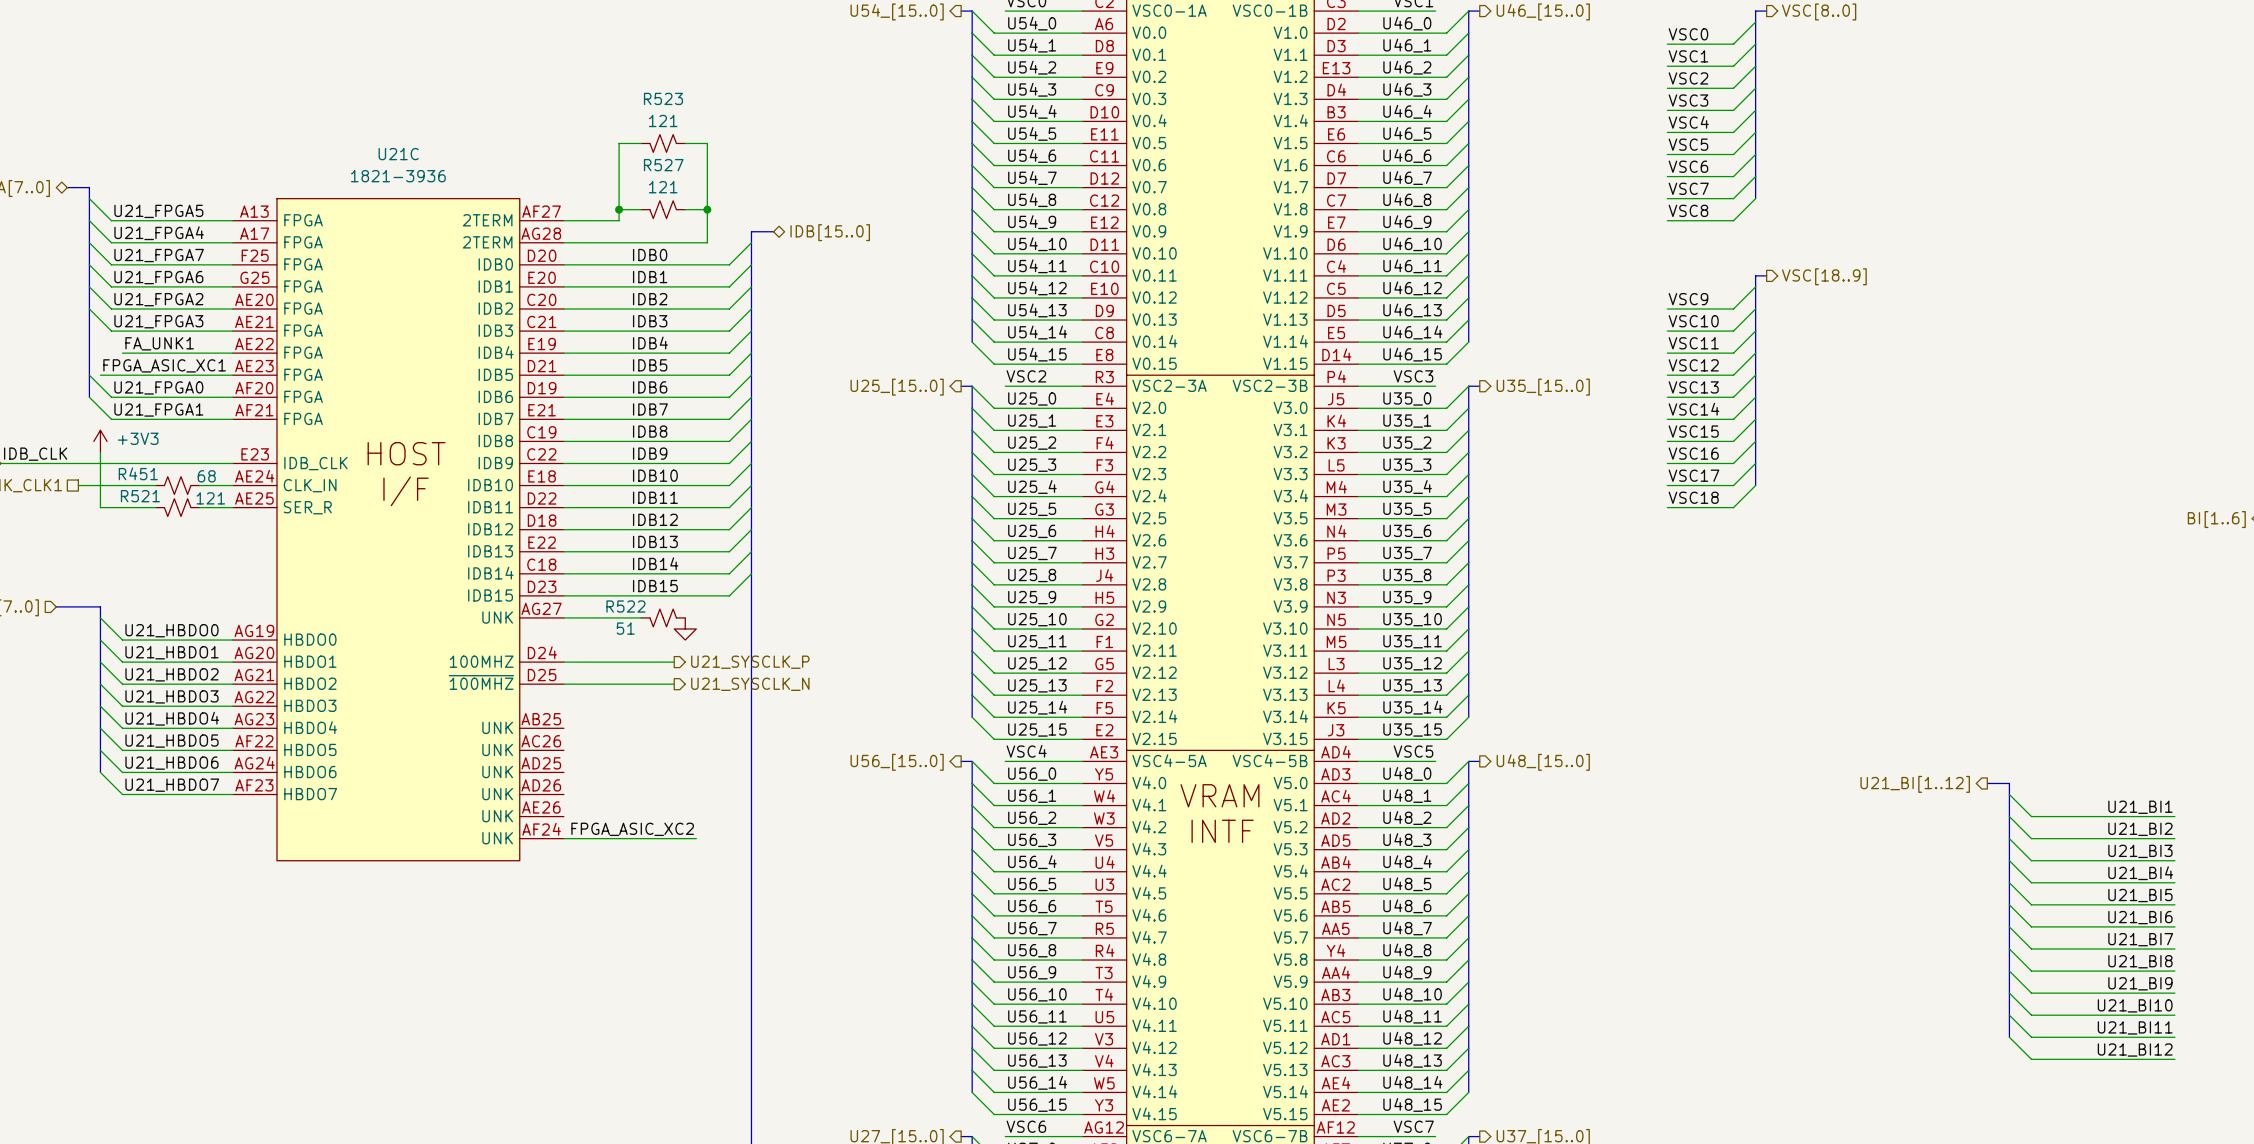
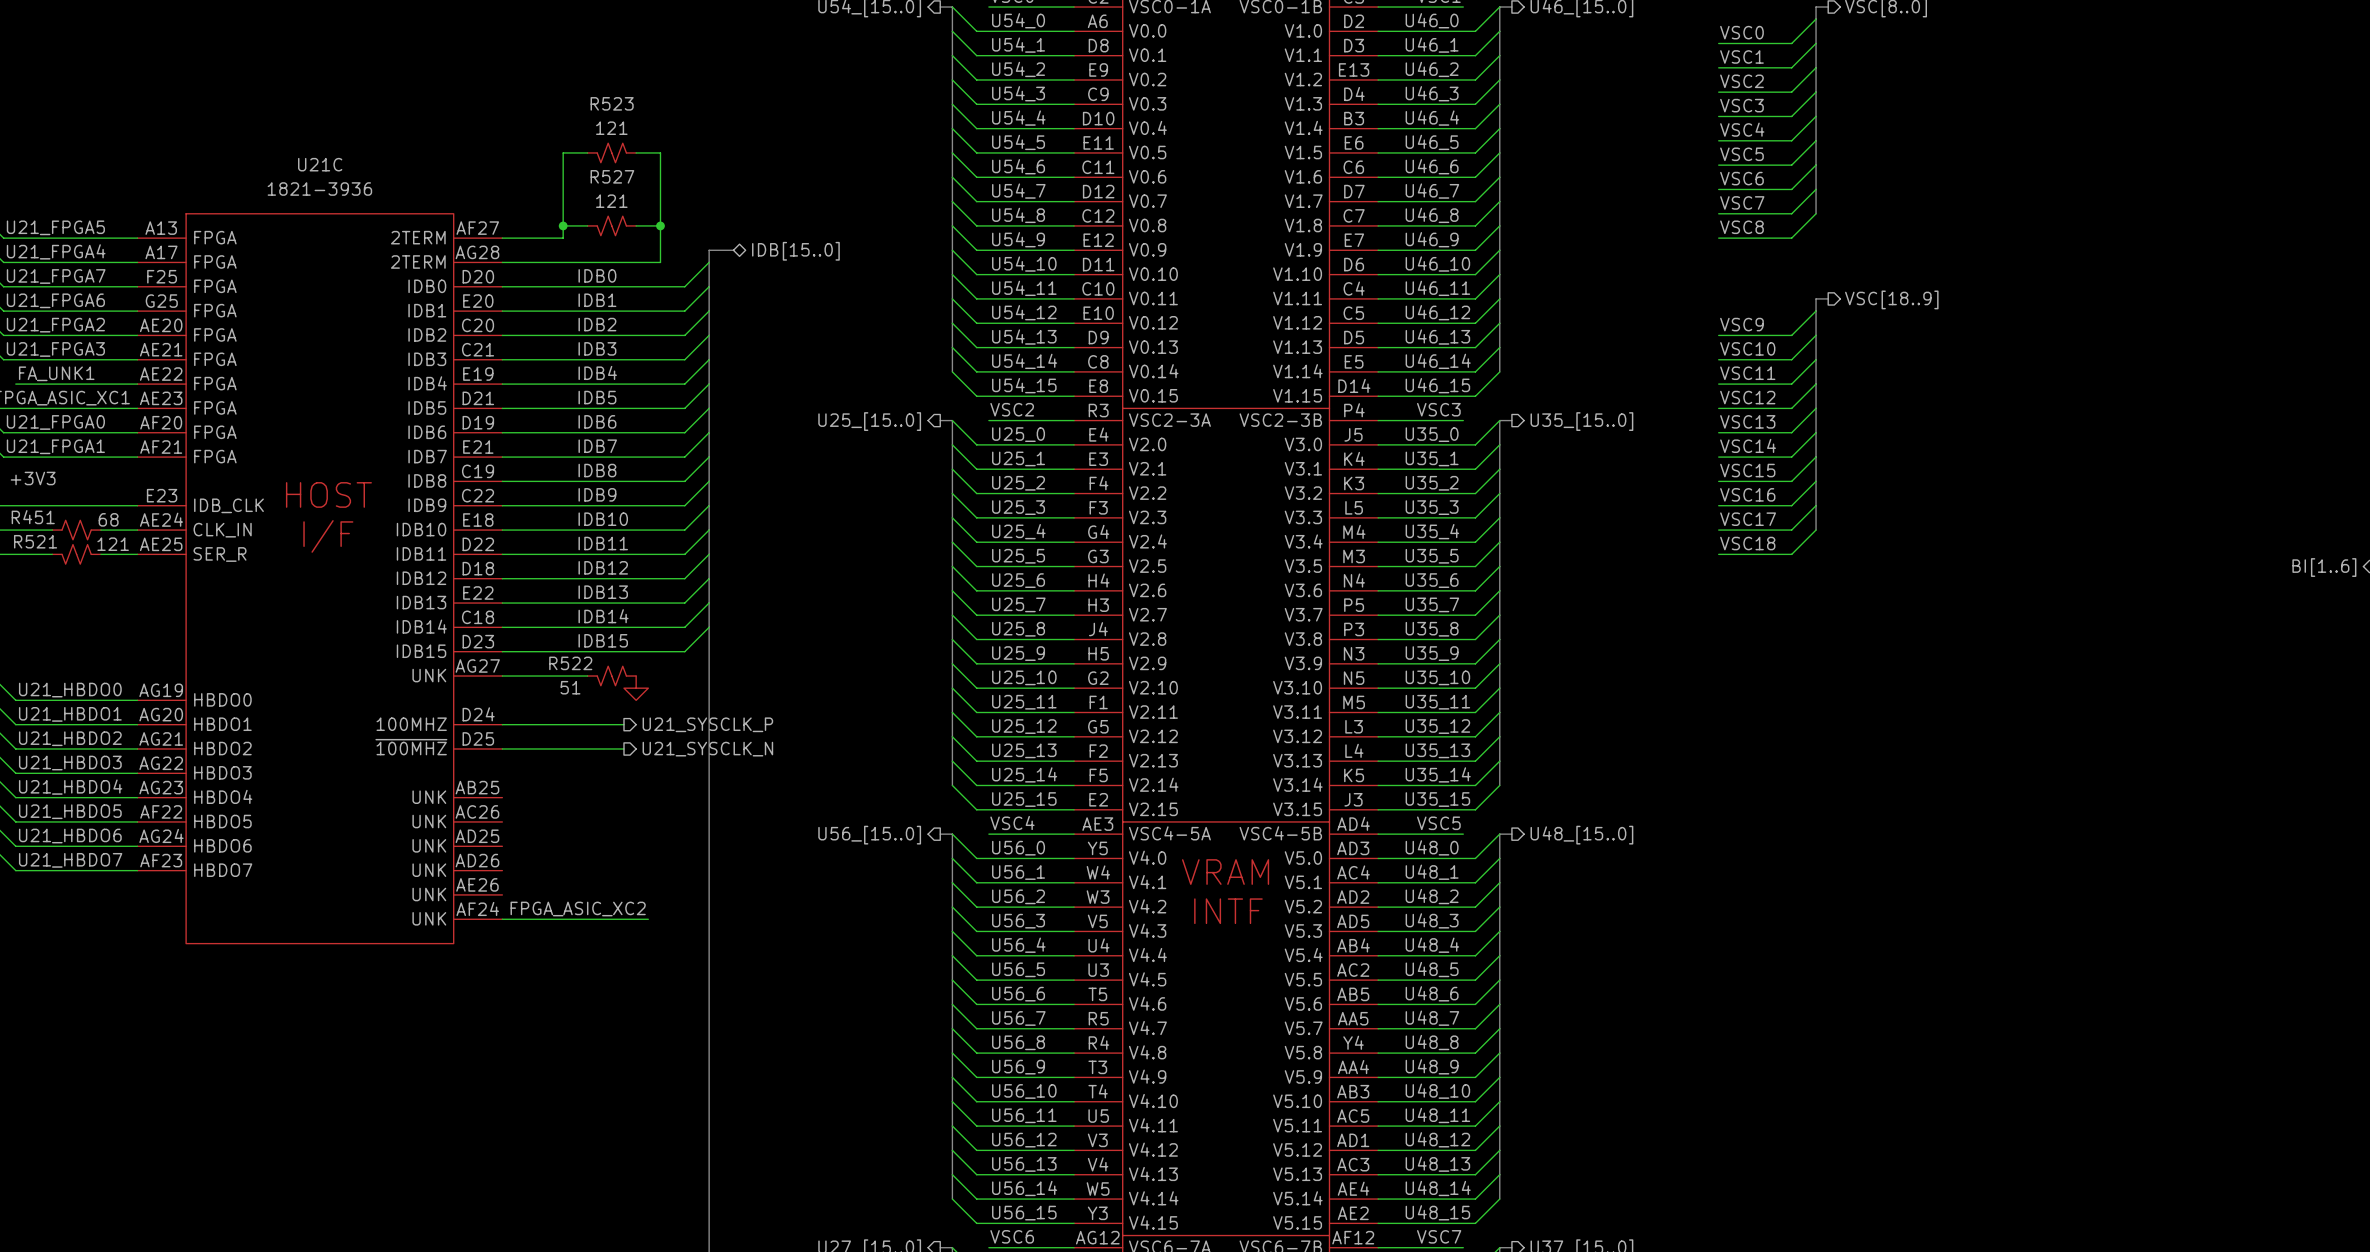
bus: (1987, 783) (2009, 783) (2009, 1037) -> none
hierarchical label: U21_BI[1..12] (1915, 784) -> none
wire: (2009, 794) (2031, 816) (2174, 816) -> none
label: U21_BI1 (2140, 807) -> none
wire: (2009, 816) (2031, 838) (2174, 838) -> none
label: U21_BI2 (2140, 829) -> none
wire: (2009, 838) (2031, 860) (2174, 860) -> none
label: U21_BI3 (2140, 851) -> none
wire: (2009, 860) (2031, 882) (2174, 882) -> none
label: U21_BI4 (2140, 873) -> none
wire: (2009, 882) (2031, 904) (2174, 904) -> none
label: U21_BI5 (2140, 895) -> none
wire: (2009, 904) (2031, 926) (2174, 926) -> none
label: U21_BI6 (2140, 917) -> none
wire: (2009, 926) (2031, 948) (2174, 948) -> none
label: U21_BI7 (2140, 939) -> none
wire: (2009, 948) (2031, 971) (2174, 971) -> none
label: U21_BI8 (2140, 961) -> none
wire: (2009, 971) (2031, 993) (2174, 993) -> none
label: U21_BI9 (2140, 983) -> none
wire: (2009, 993) (2031, 1015) (2174, 1015) -> none
label: U21_BI10 (2135, 1005) -> none
wire: (2009, 1015) (2031, 1037) (2174, 1037) -> none
label: U21_BI11 (2135, 1027) -> none
wire: (2009, 1037) (2031, 1059) (2174, 1059) -> none
label: U21_BI12 (2135, 1050) -> none

